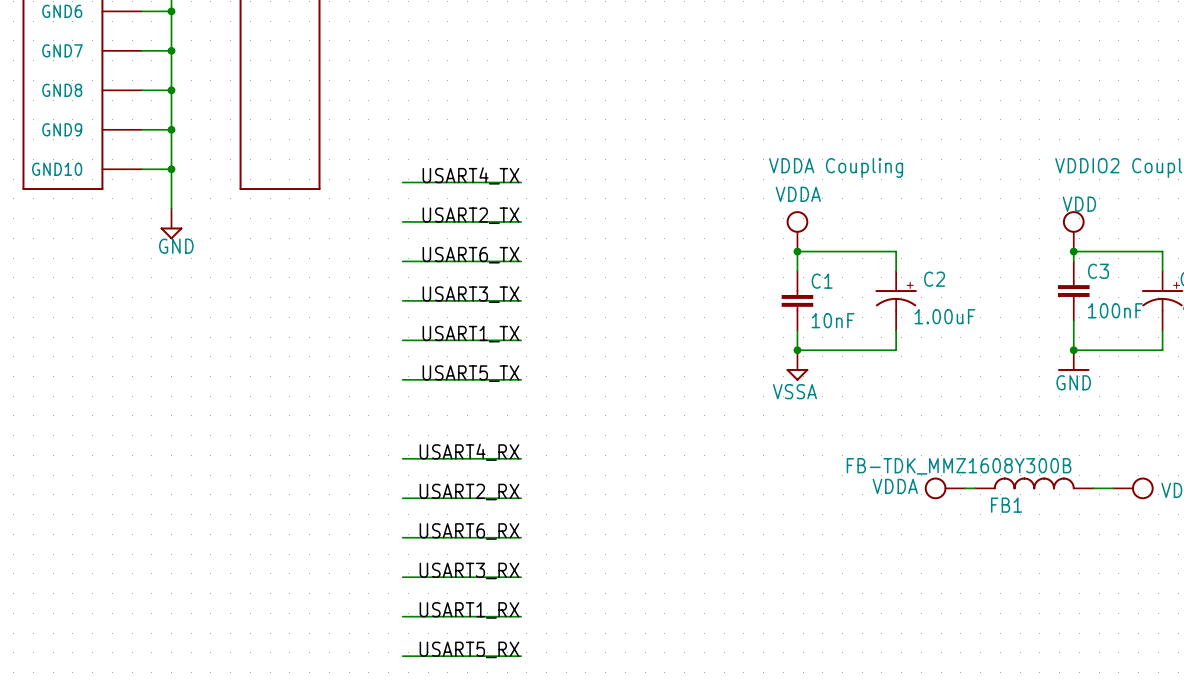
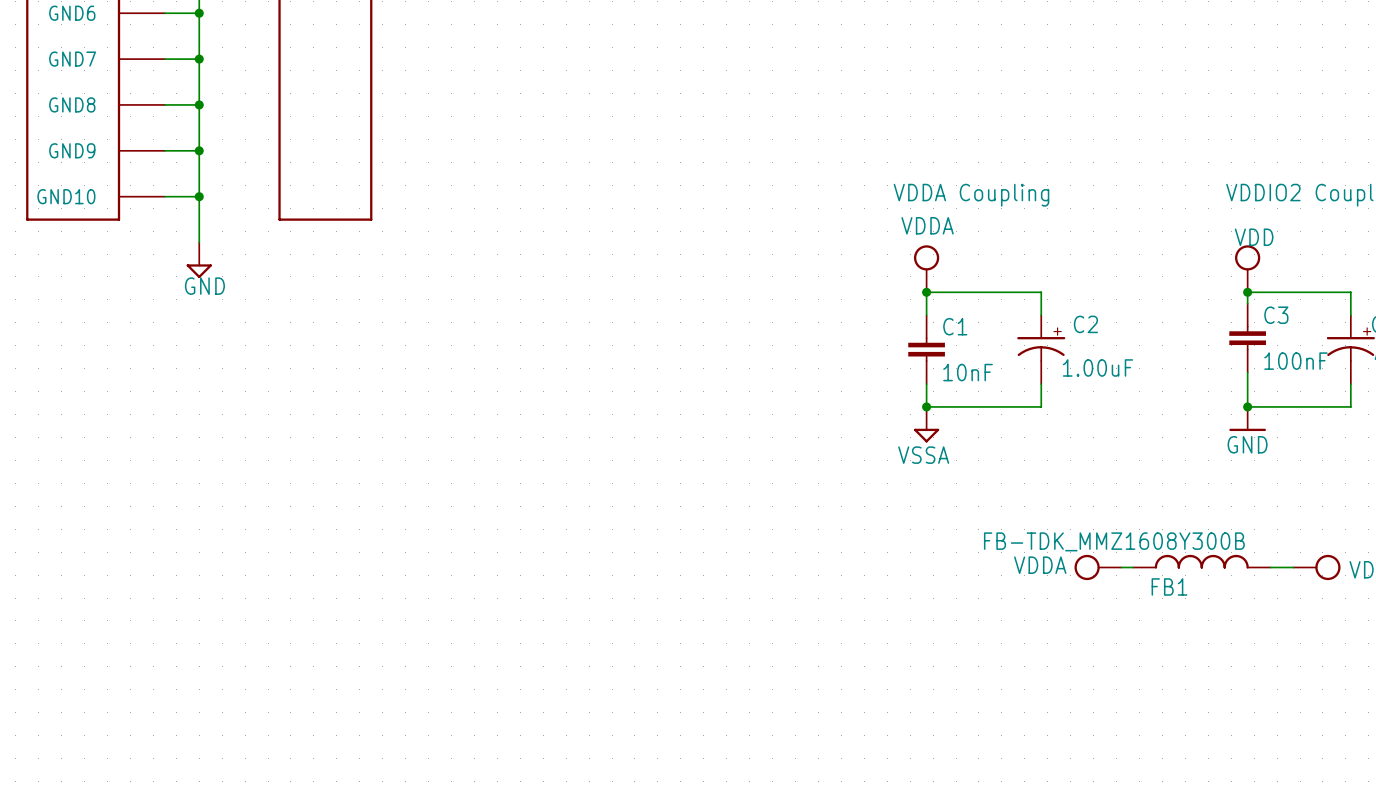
label: USART4_TX (470, 175) -> none
wire: (402, 182) (521, 182) -> none
label: USART2_TX (470, 215) -> none
wire: (402, 221) (521, 221) -> none
label: USART6_TX (470, 255) -> none
wire: (402, 261) (521, 261) -> none
label: USART3_TX (470, 294) -> none
wire: (402, 300) (521, 300) -> none
label: USART1_TX (470, 334) -> none
wire: (402, 340) (521, 340) -> none
label: USART5_TX (470, 373) -> none
wire: (402, 379) (521, 379) -> none
label: USART4_RX (469, 452) -> none
wire: (402, 458) (521, 458) -> none
label: USART2_RX (469, 492) -> none
wire: (402, 498) (521, 498) -> none
label: USART6_RX (469, 531) -> none
wire: (402, 537) (521, 537) -> none
label: USART3_RX (469, 570) -> none
wire: (402, 577) (521, 577) -> none
label: USART1_RX (469, 610) -> none
wire: (402, 616) (521, 616) -> none
label: USART5_RX (469, 649) -> none
wire: (402, 656) (521, 656) -> none

